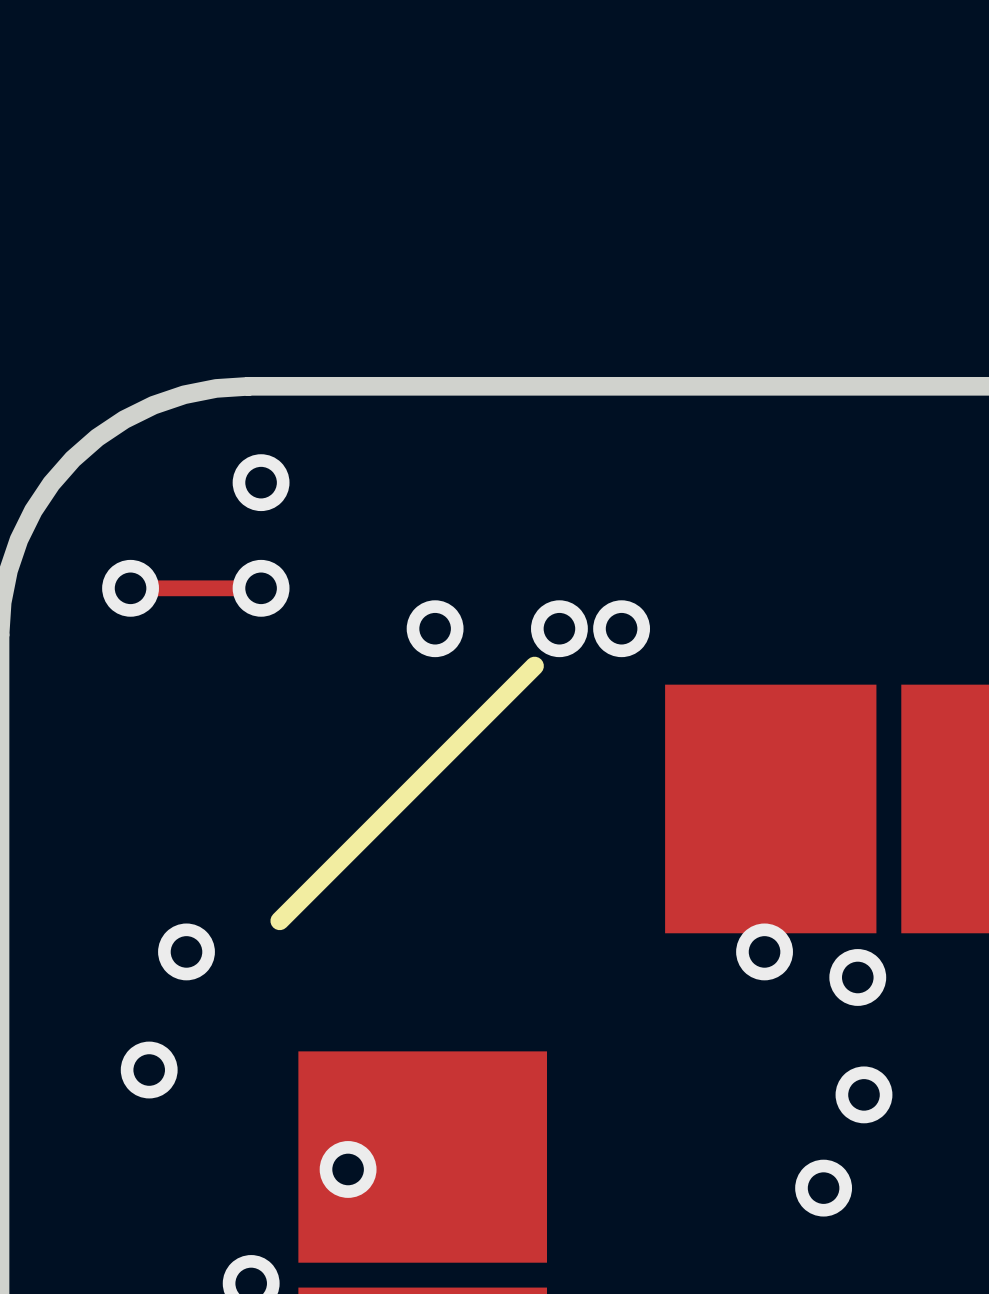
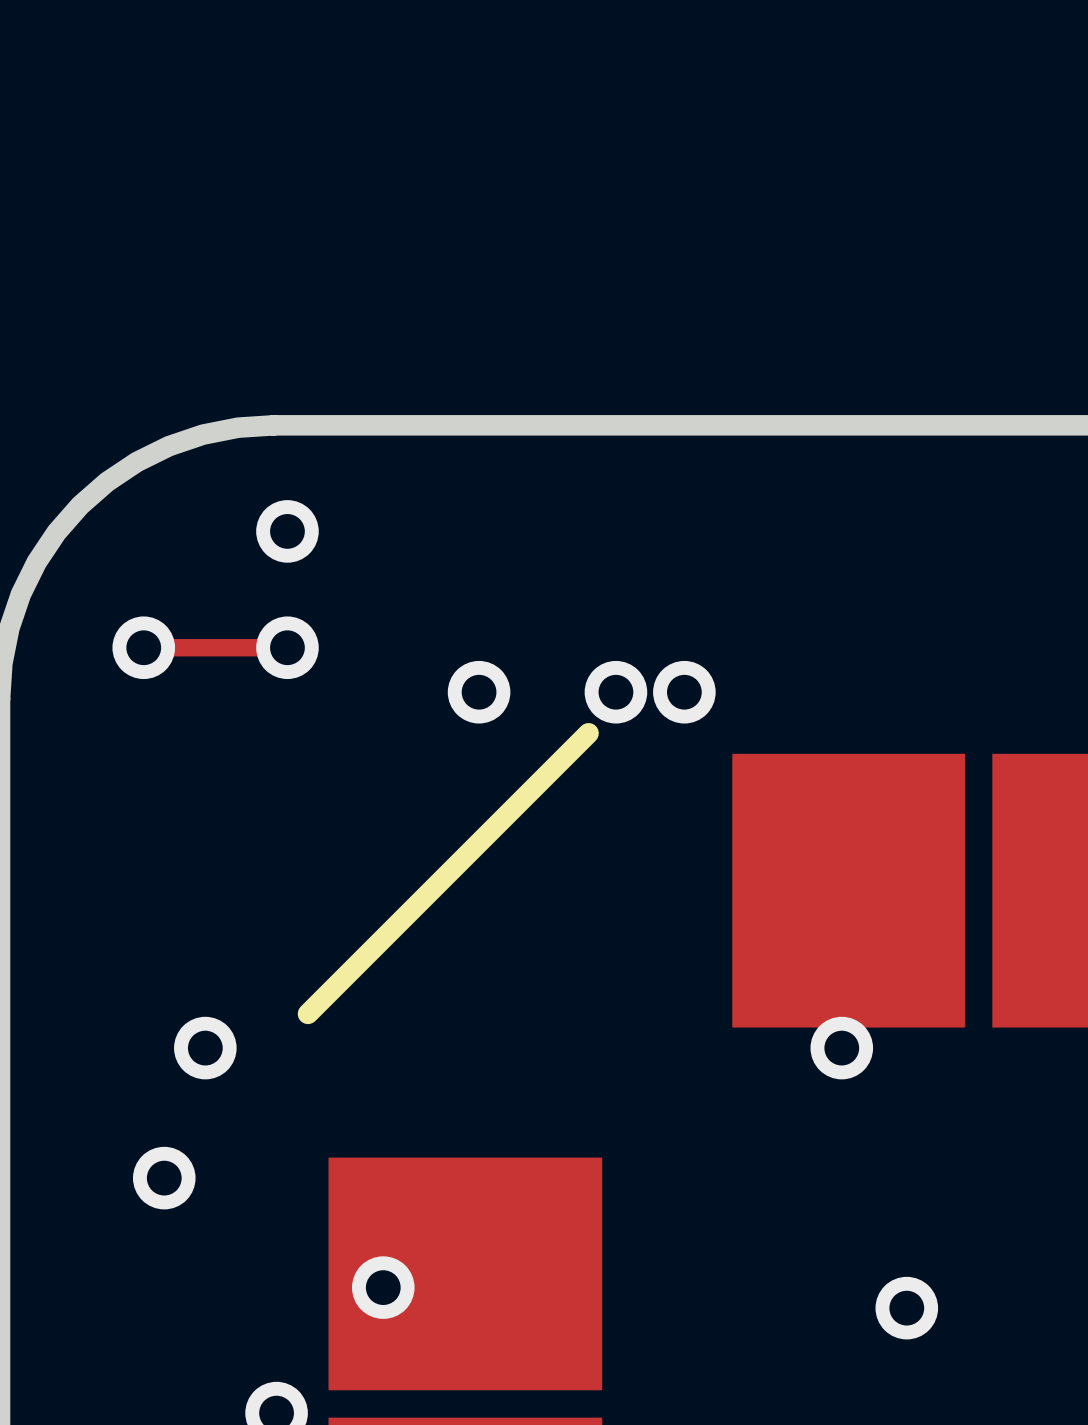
via: (857, 977) -> none
via: (863, 1094) -> none

